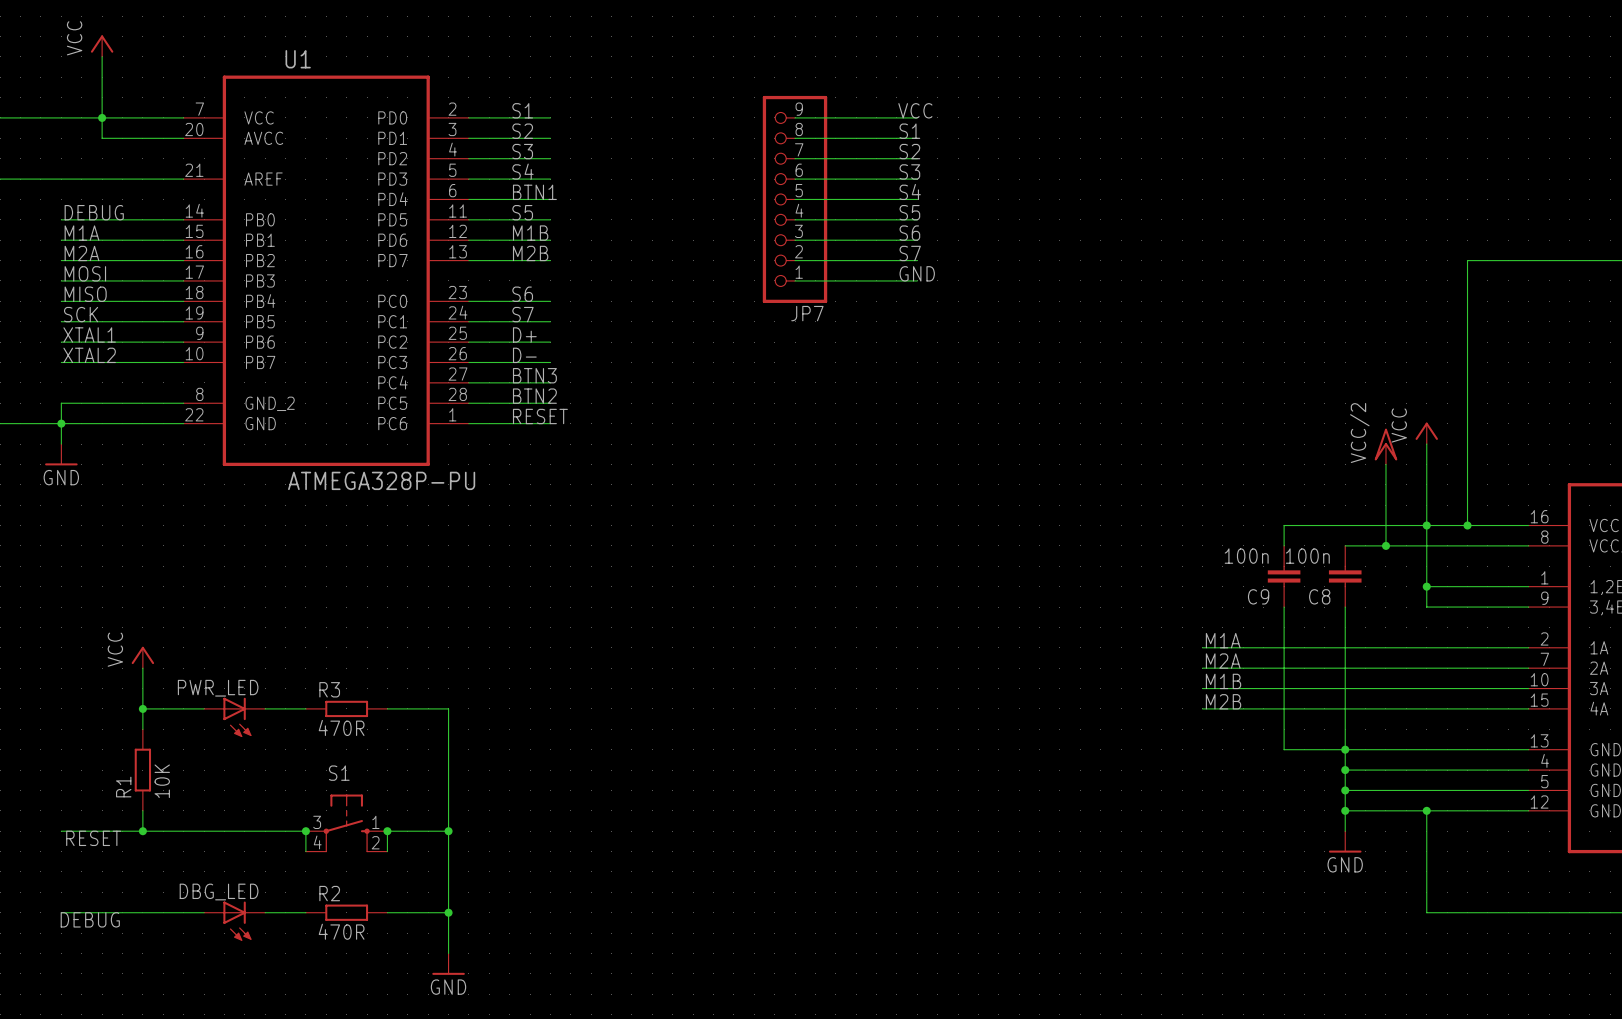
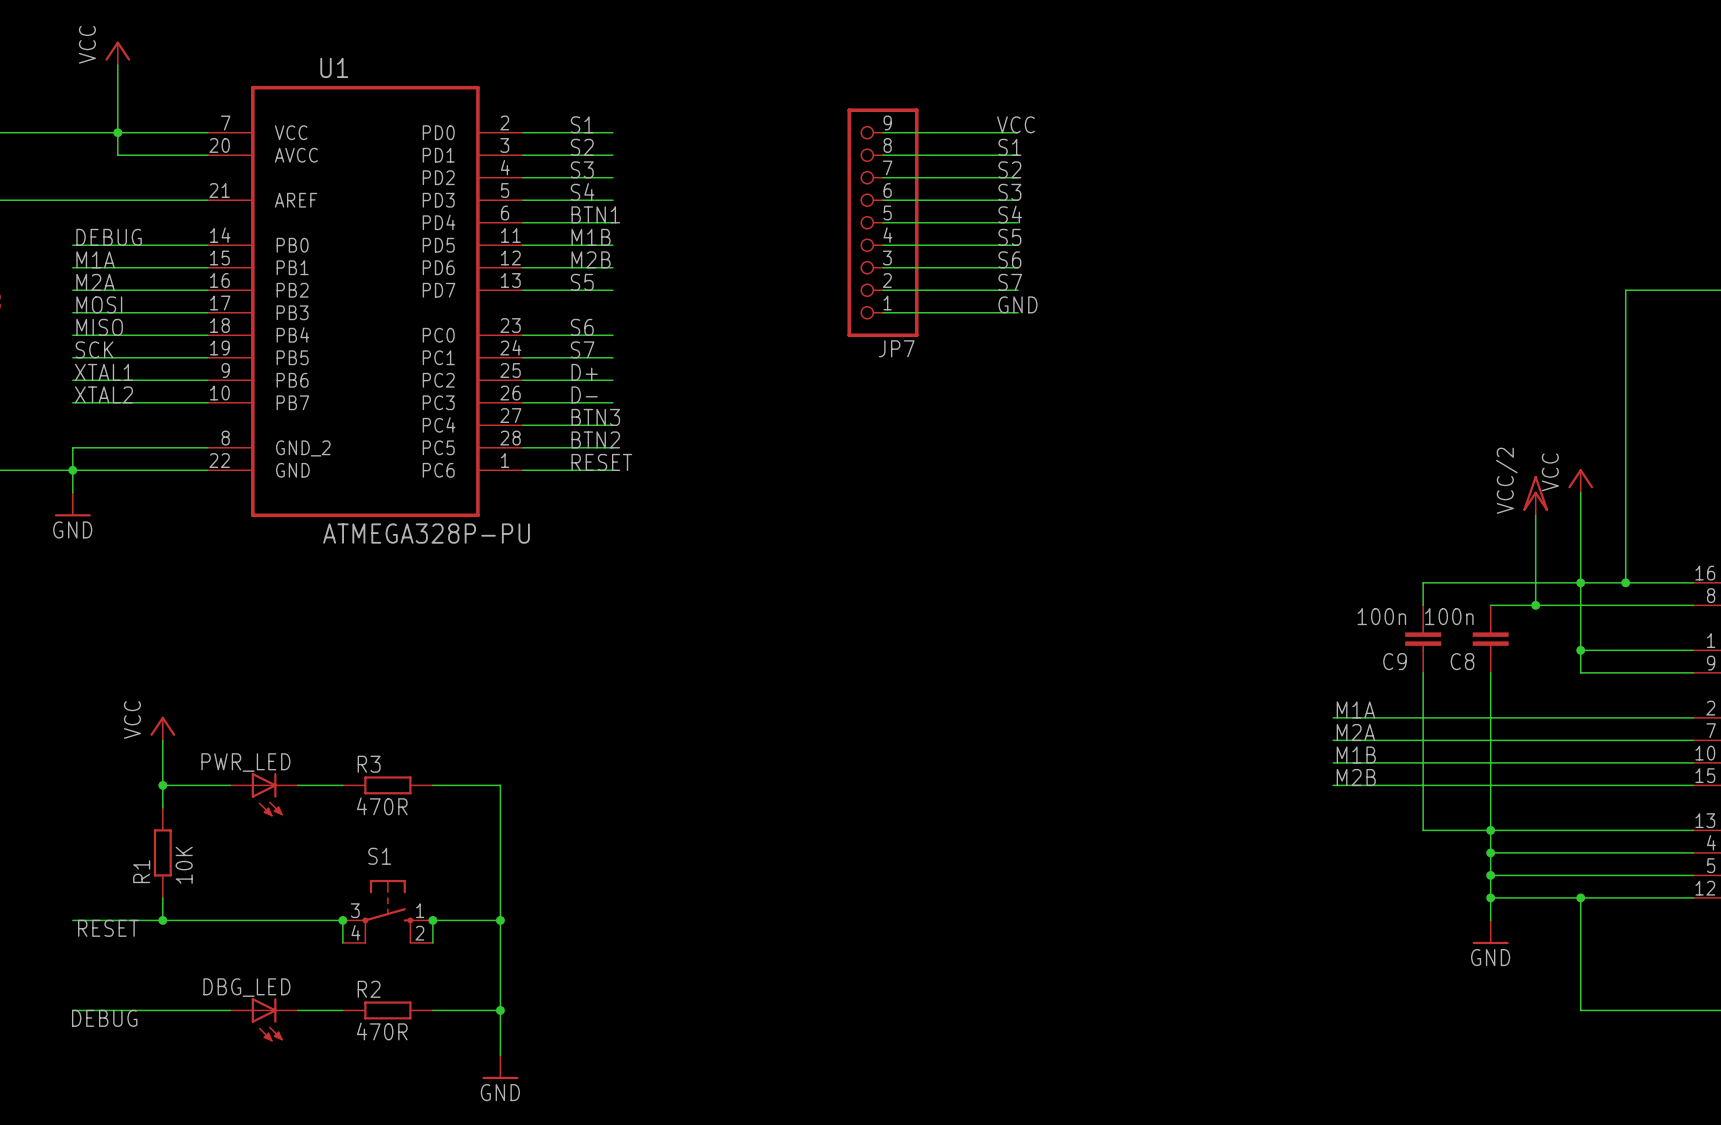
label: S5 (522, 212) -> M1B (591, 237)
label: M1B (530, 233) -> M2B (591, 259)
label: M2B (530, 253) -> S5 (582, 282)

